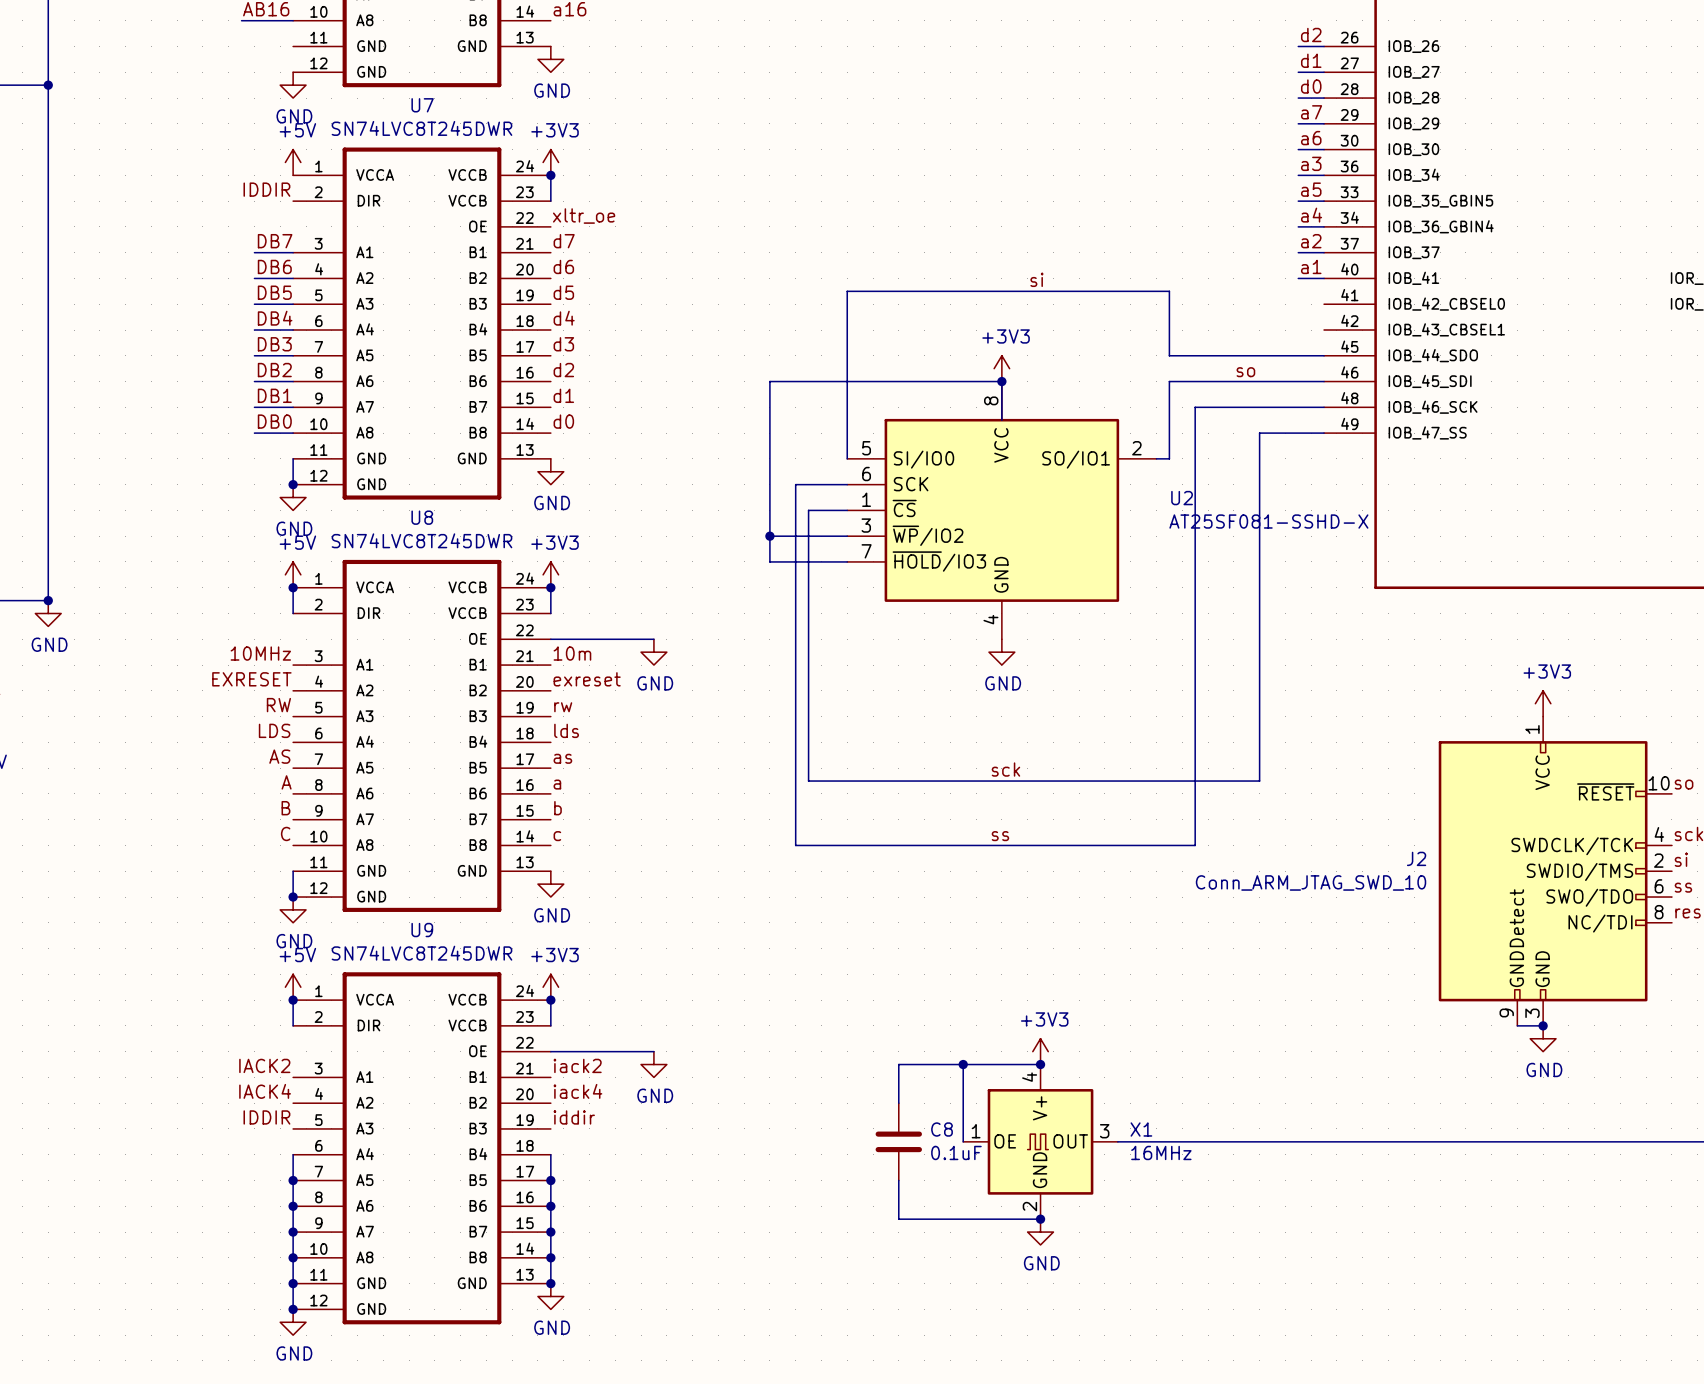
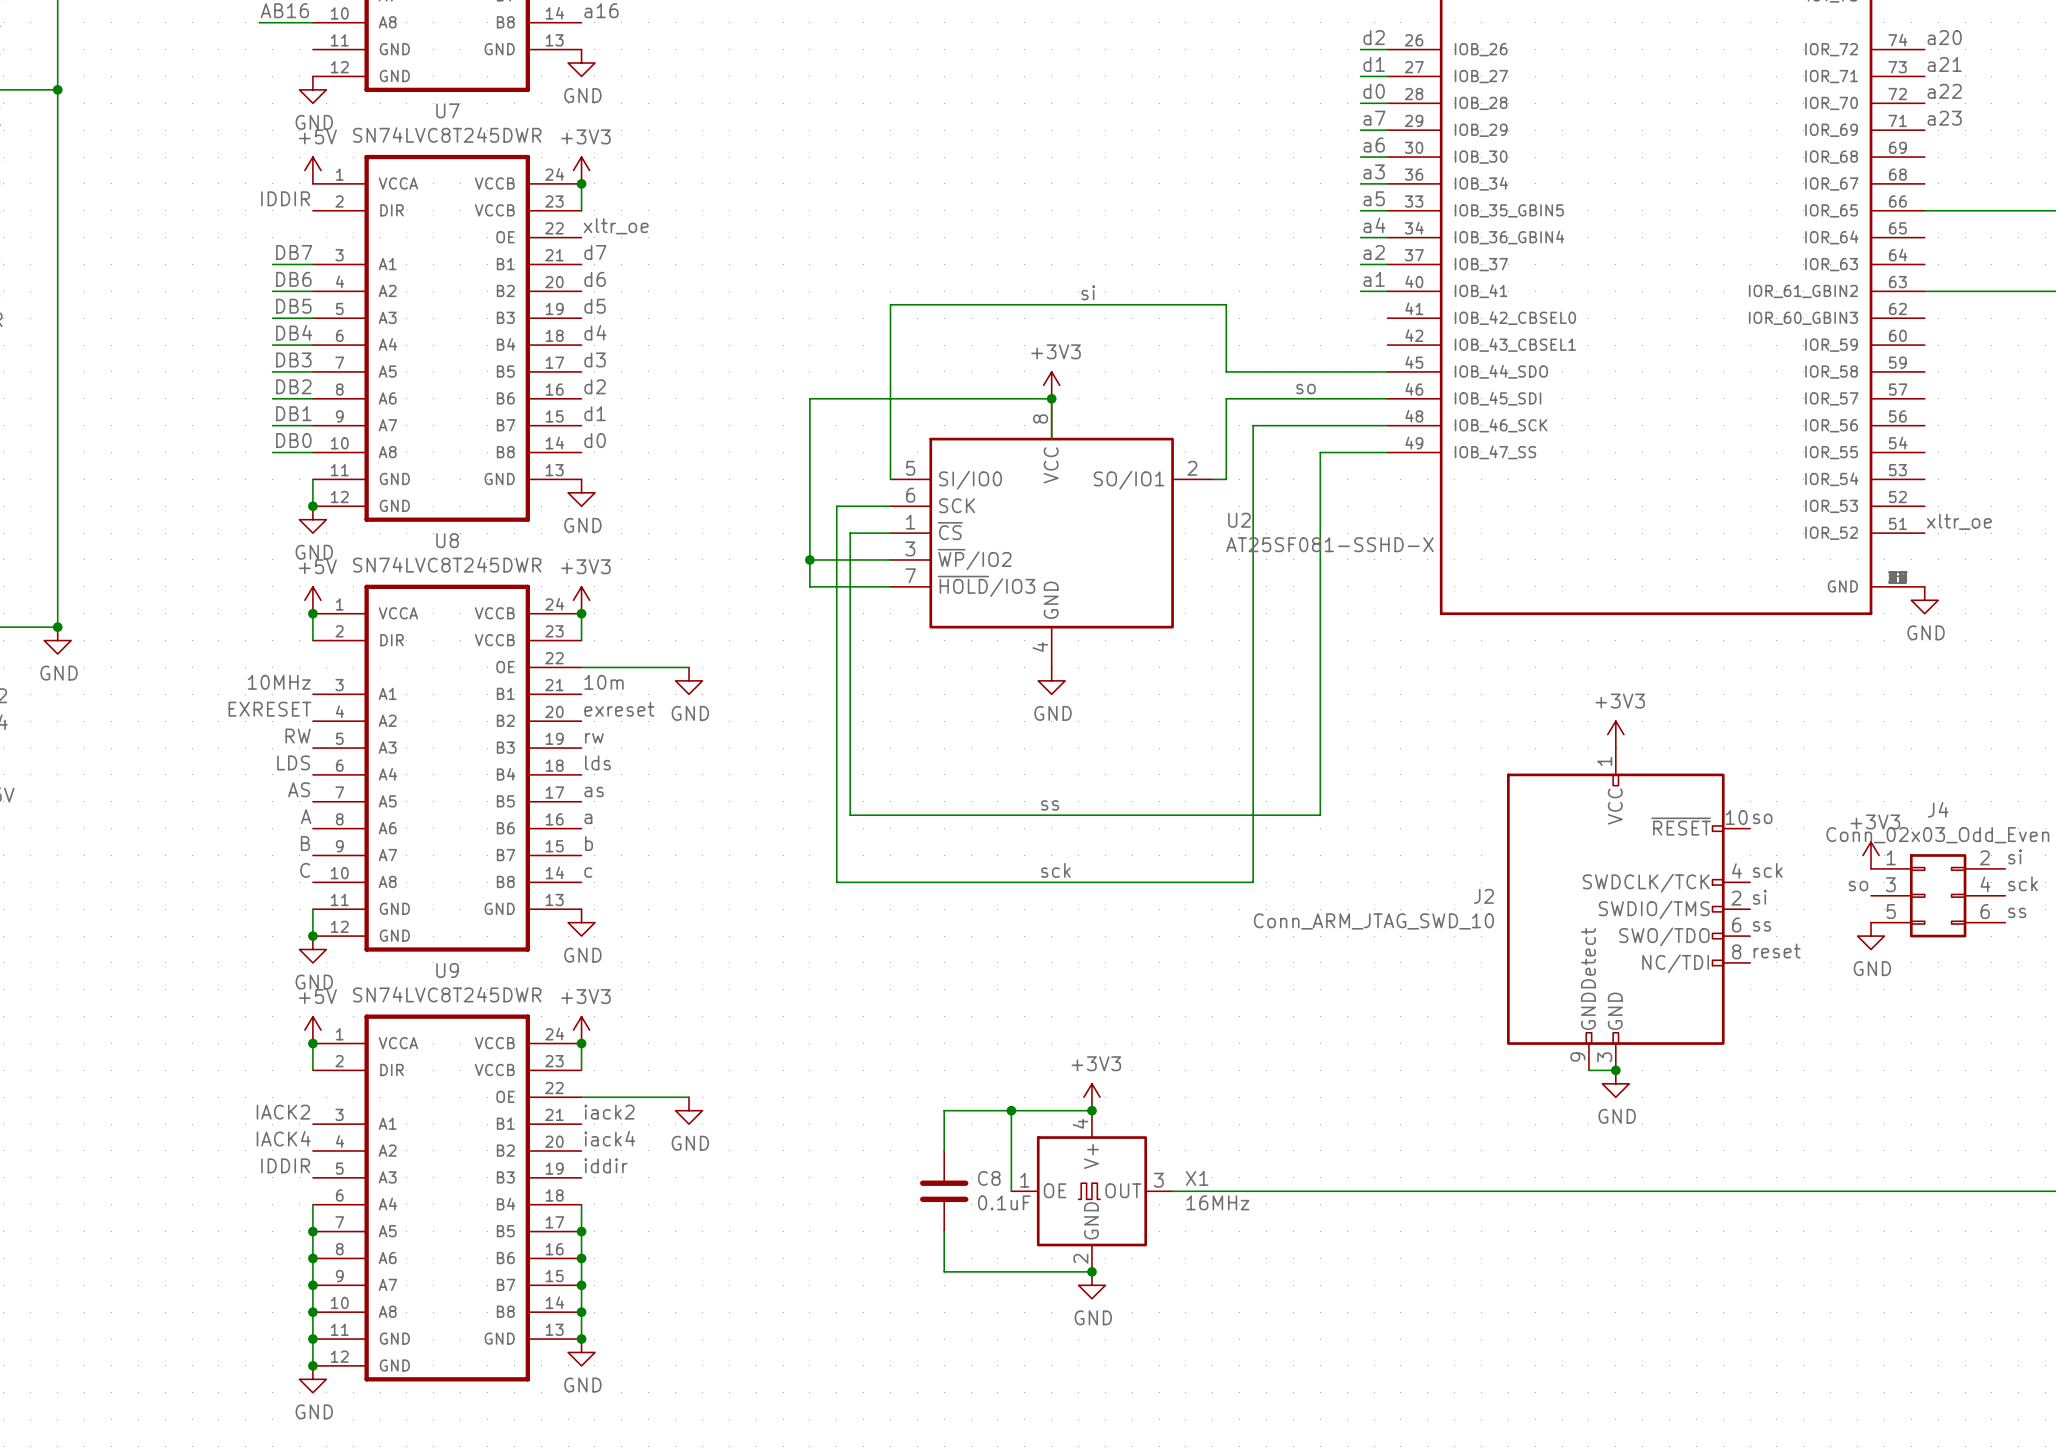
label: sck (1005, 769) -> ss (1050, 805)
label: ss (1000, 836) -> sck (1055, 870)

